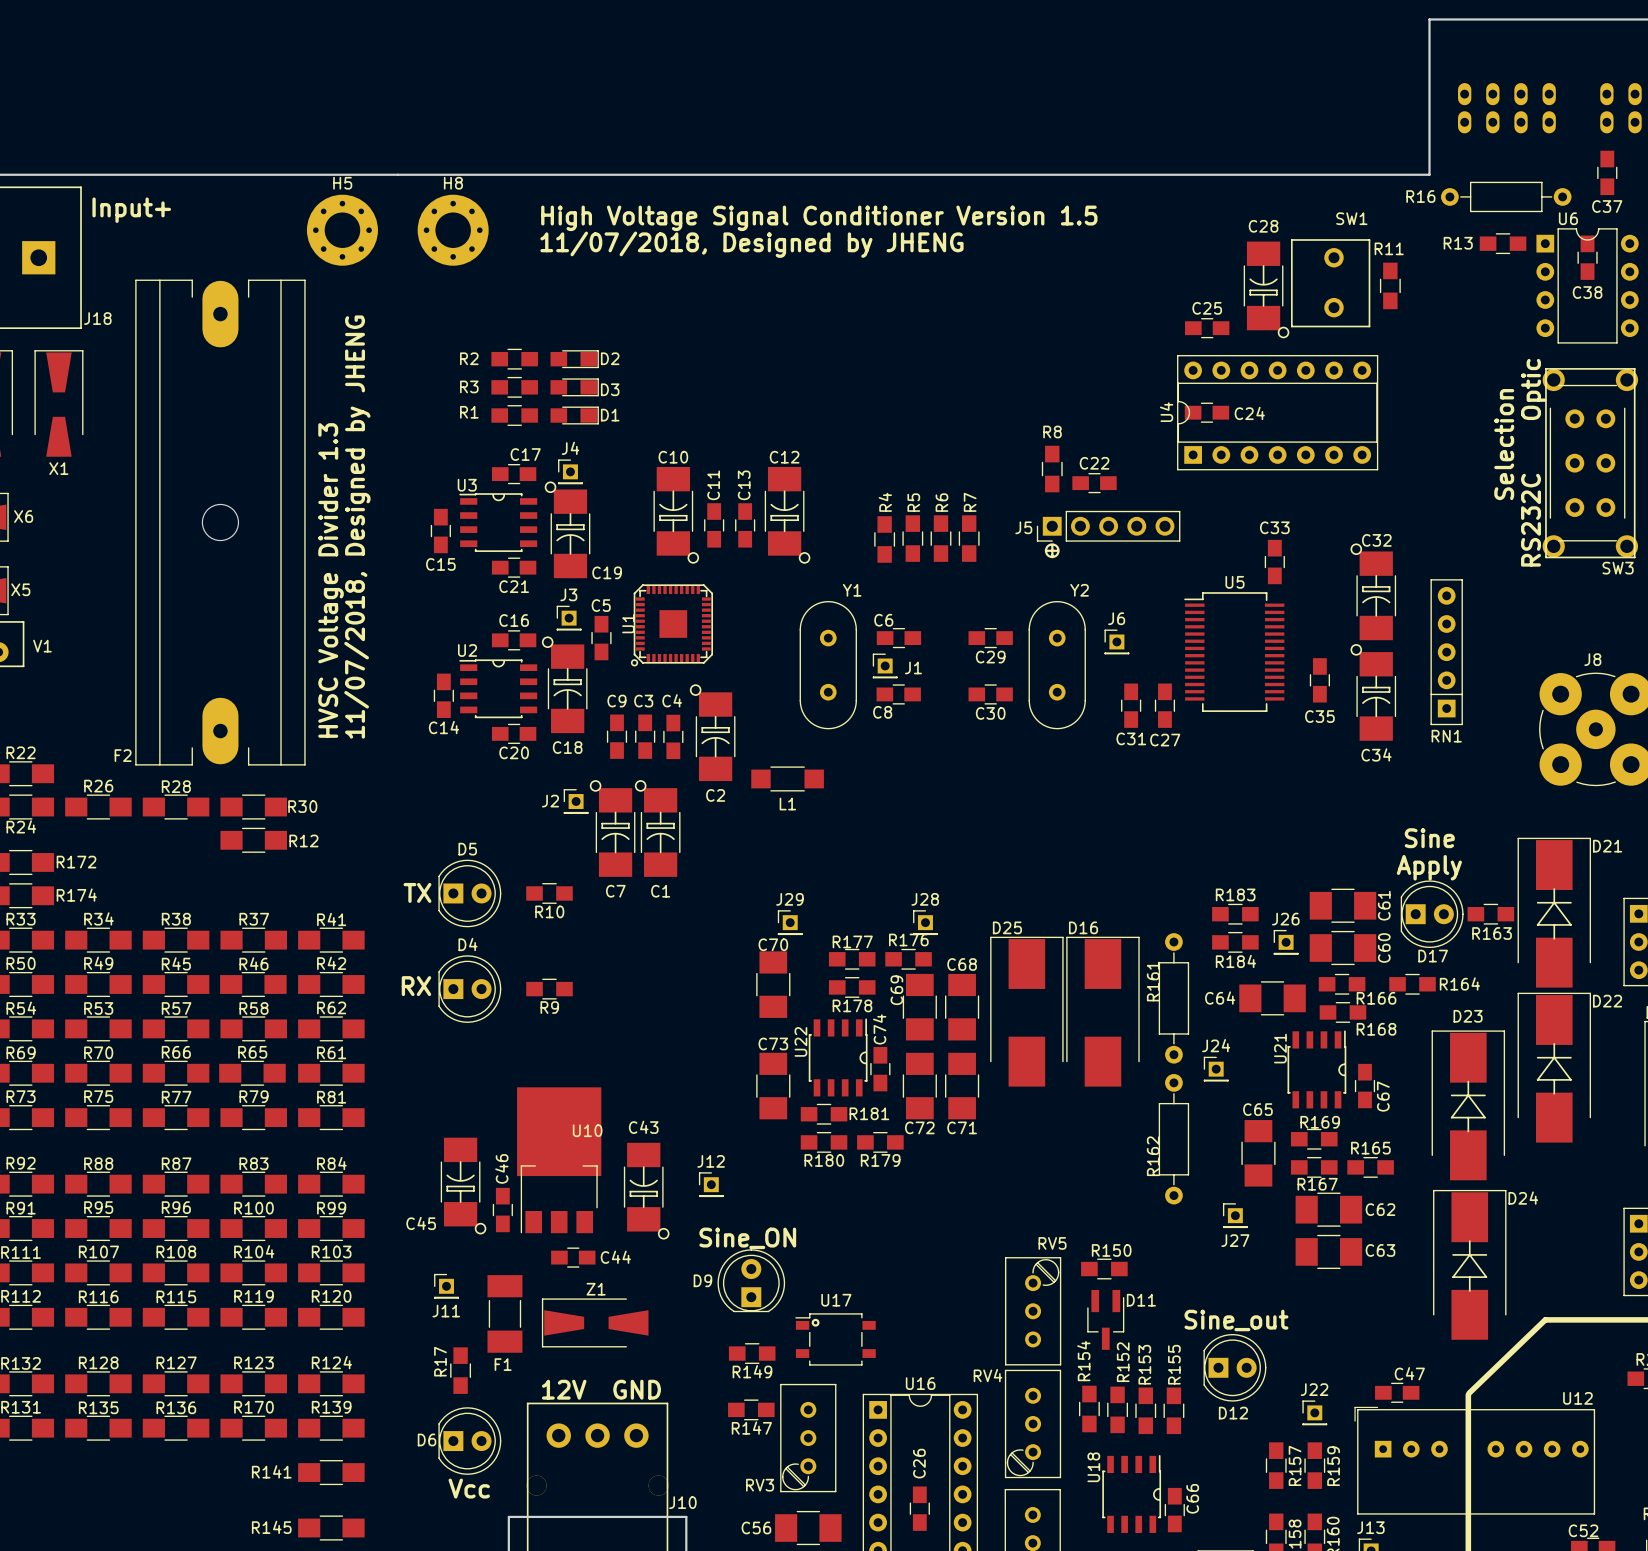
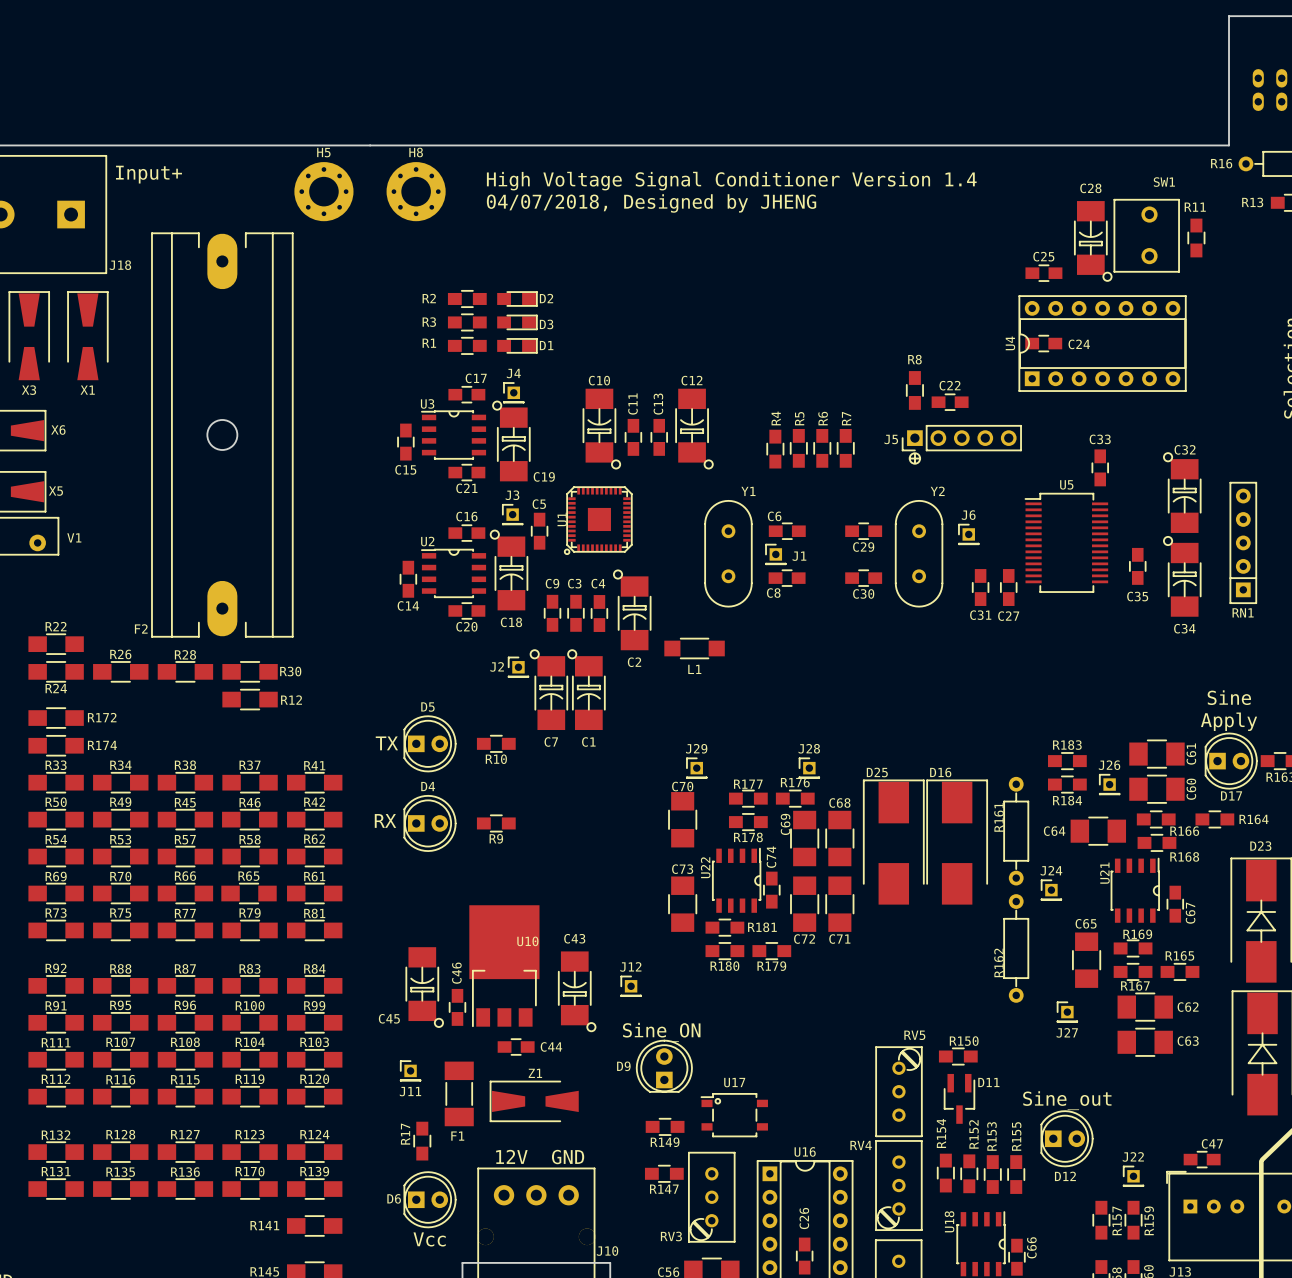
text: High Voltage Signal Conditioner Version 1.5 (819, 218) -> High Voltage Signal Conditioner Version 1.4 (731, 181)
text: 11/07/2018, Designed by JHENG (751, 244) -> 04/07/2018, Designed by JHENG (651, 203)
text: 11/07/2018, Designed by JHENG (357, 527) -> none
text: HVSC Voltage Divider 1.3 (331, 580) -> none

